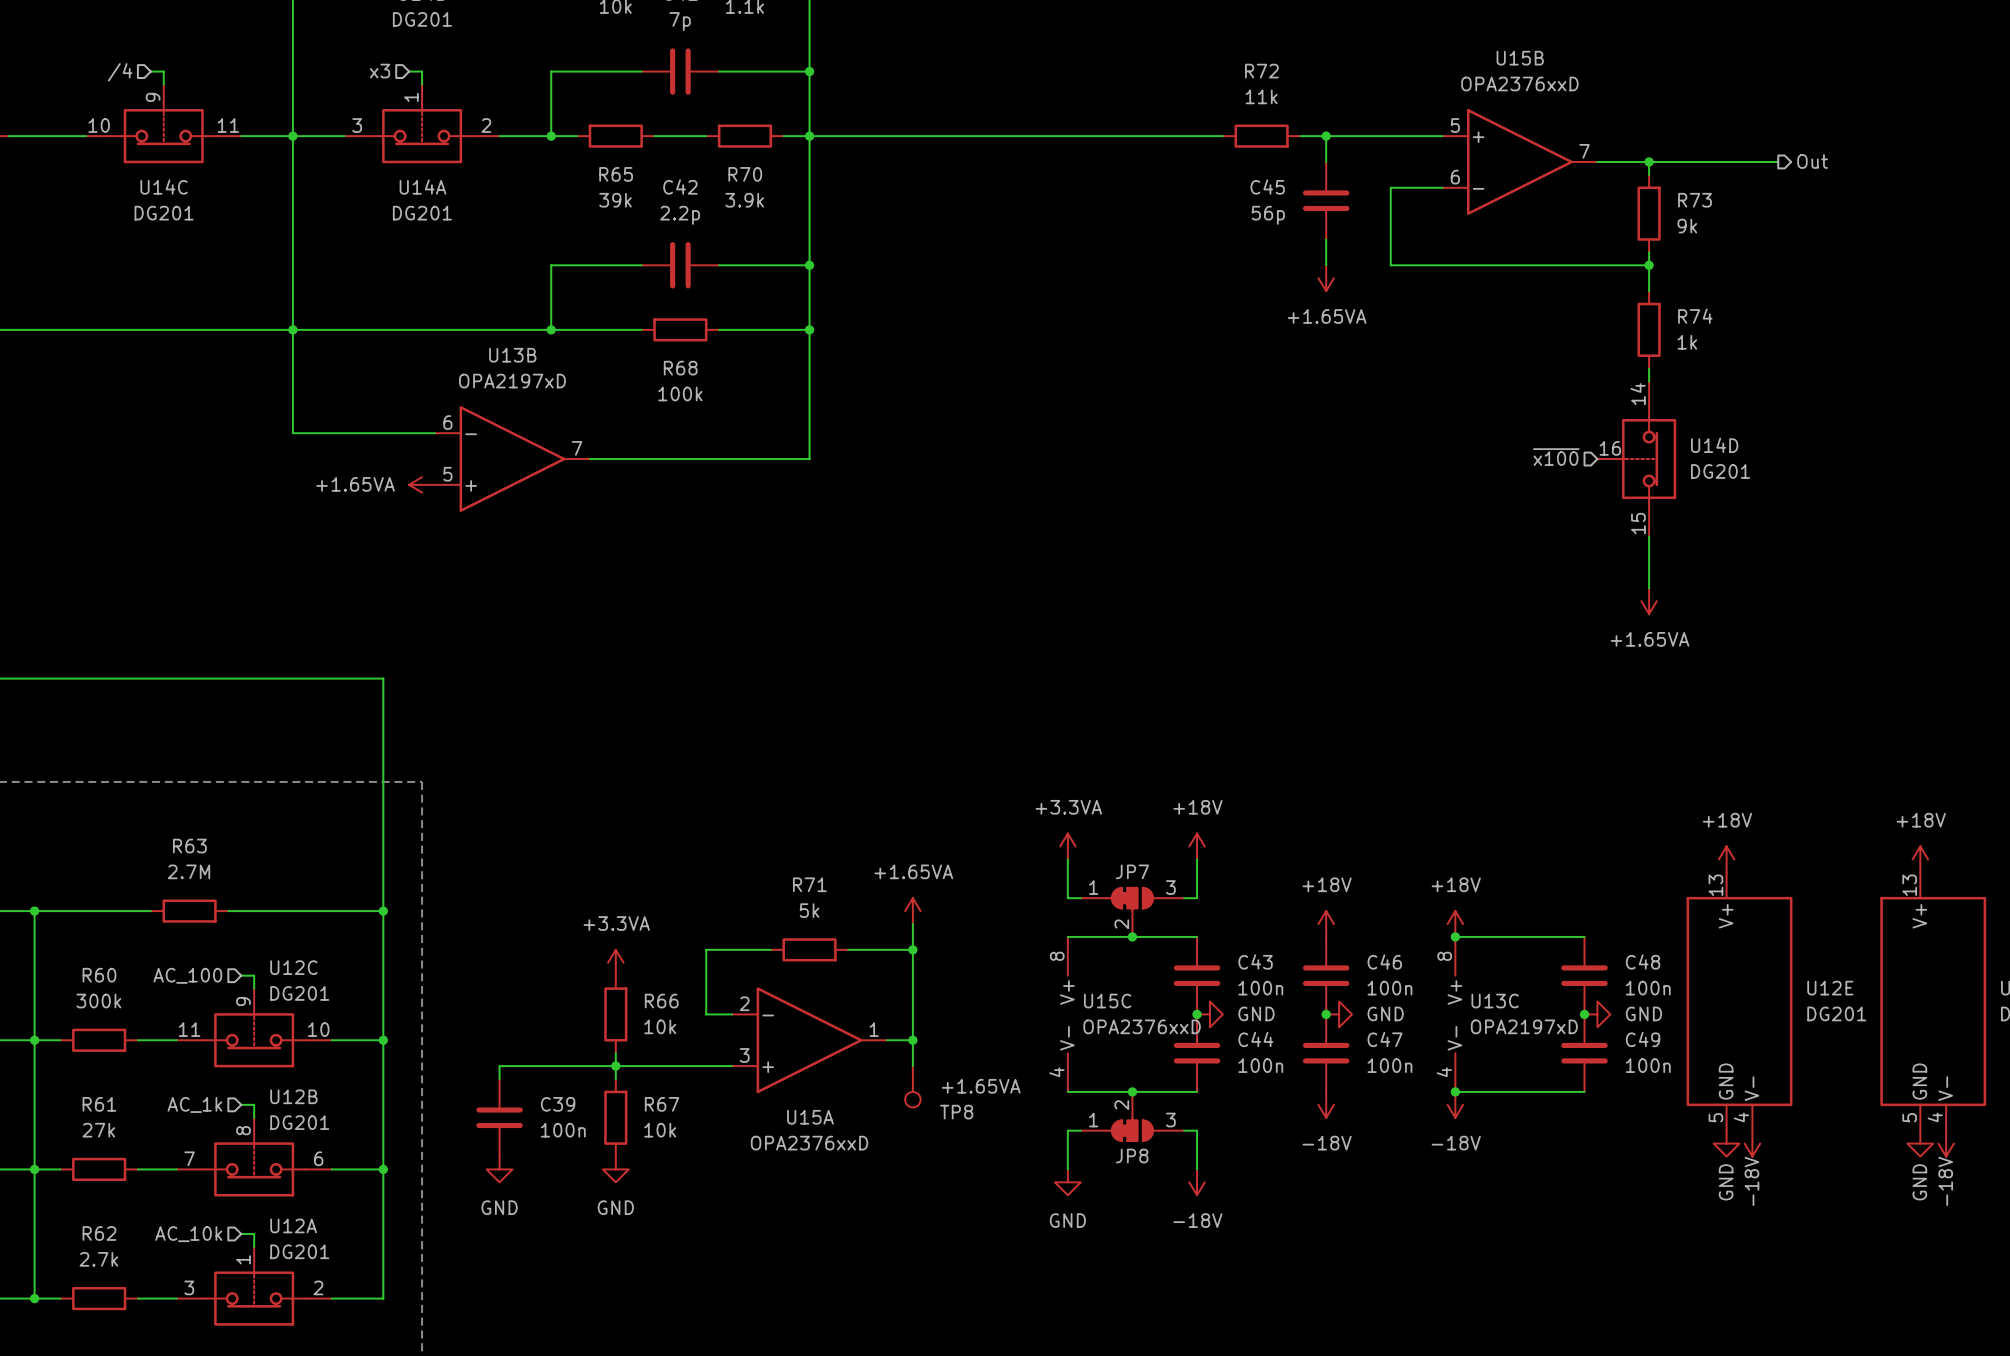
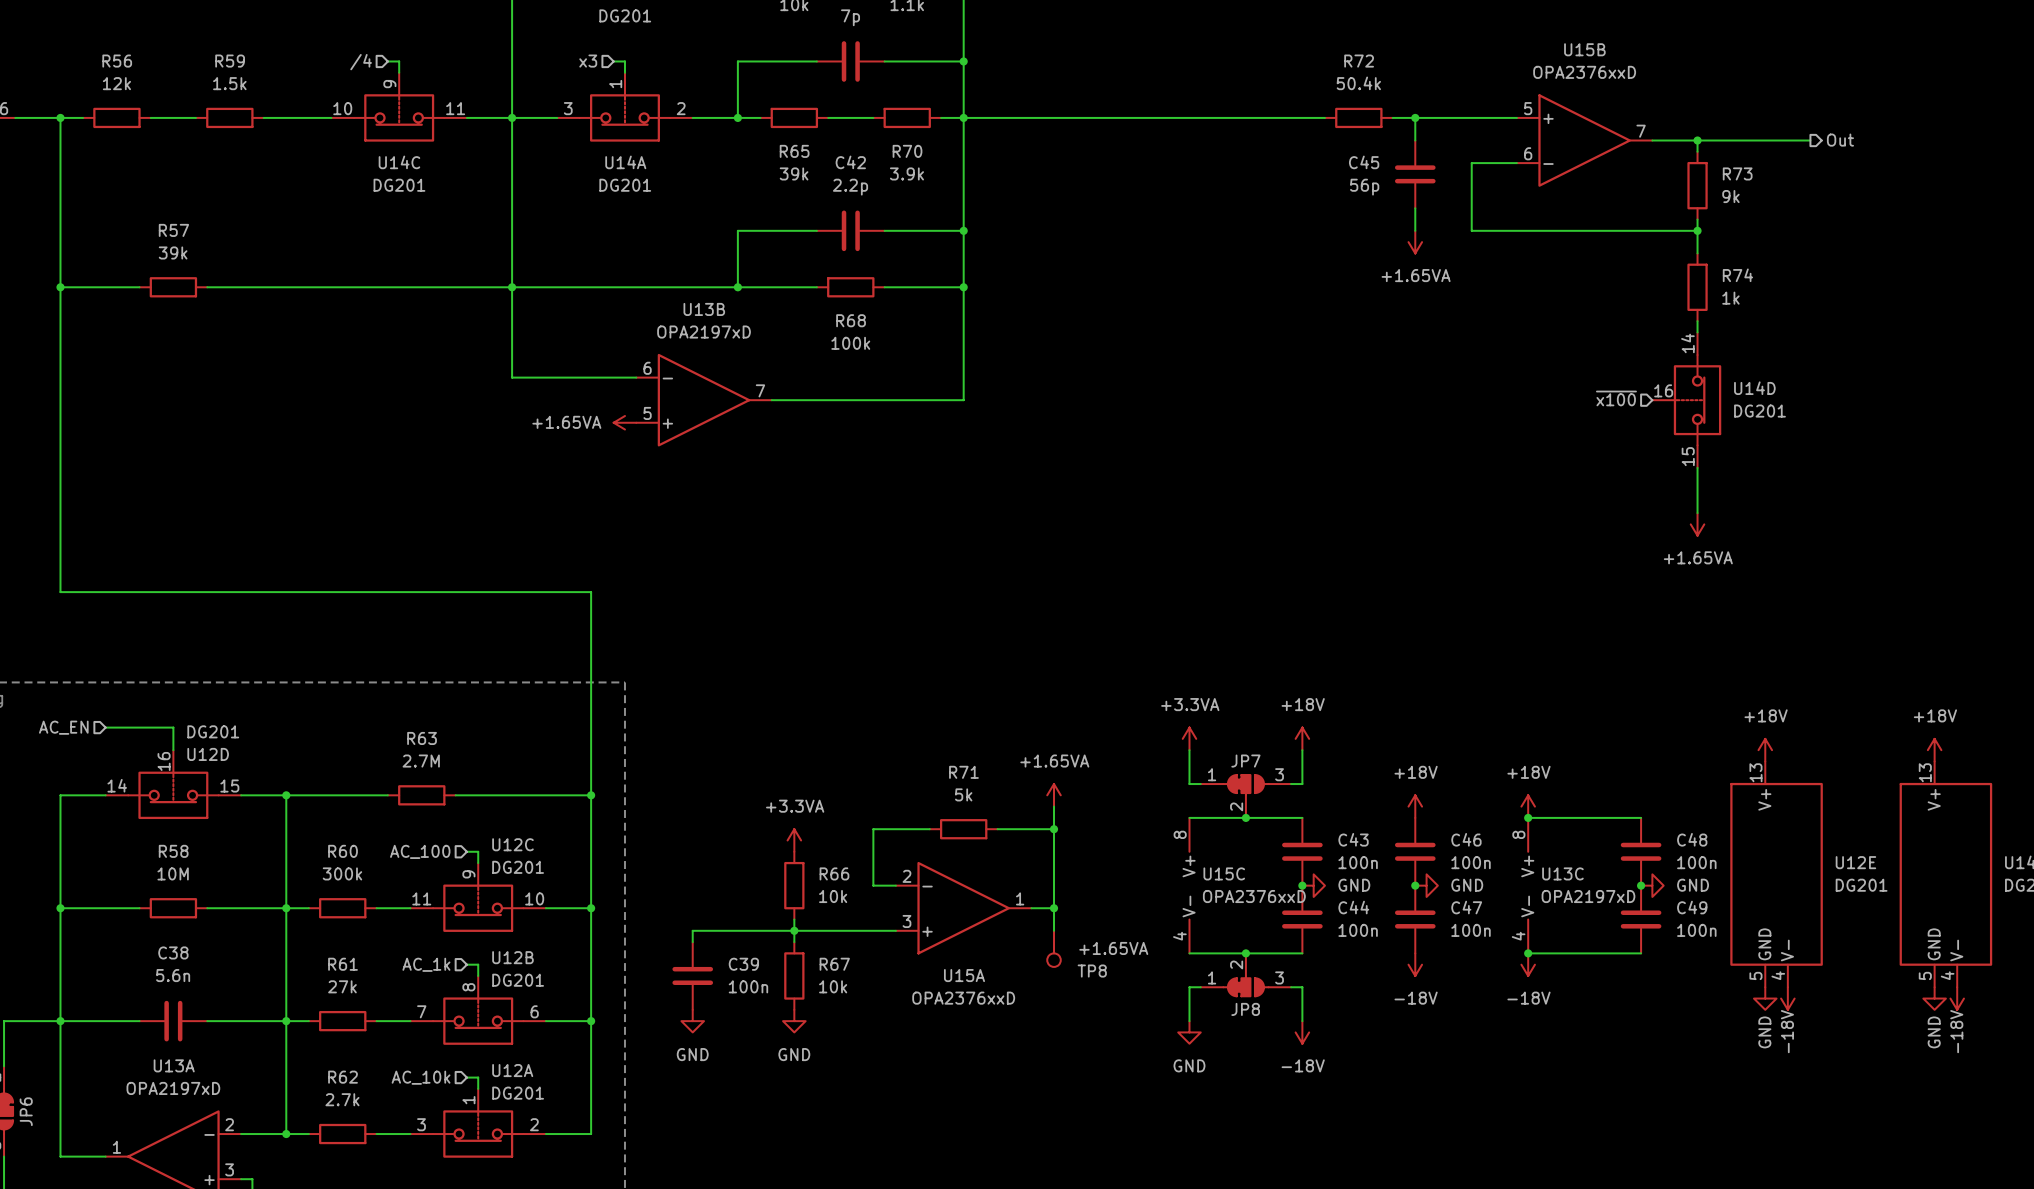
R72 value: 11k (1261, 96) -> 50.4k (1358, 83)

